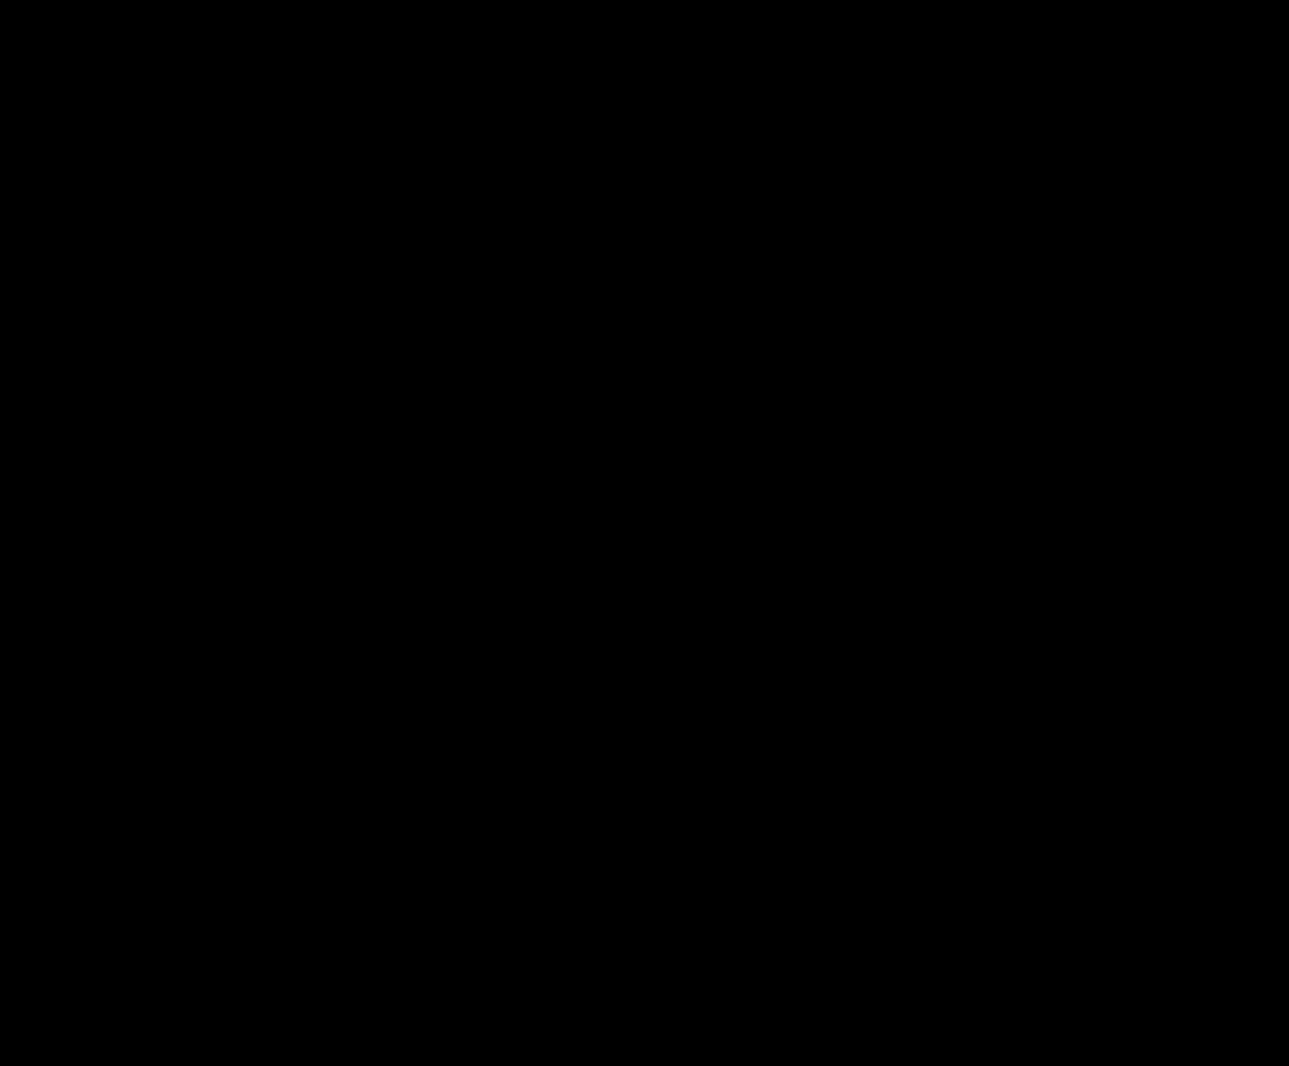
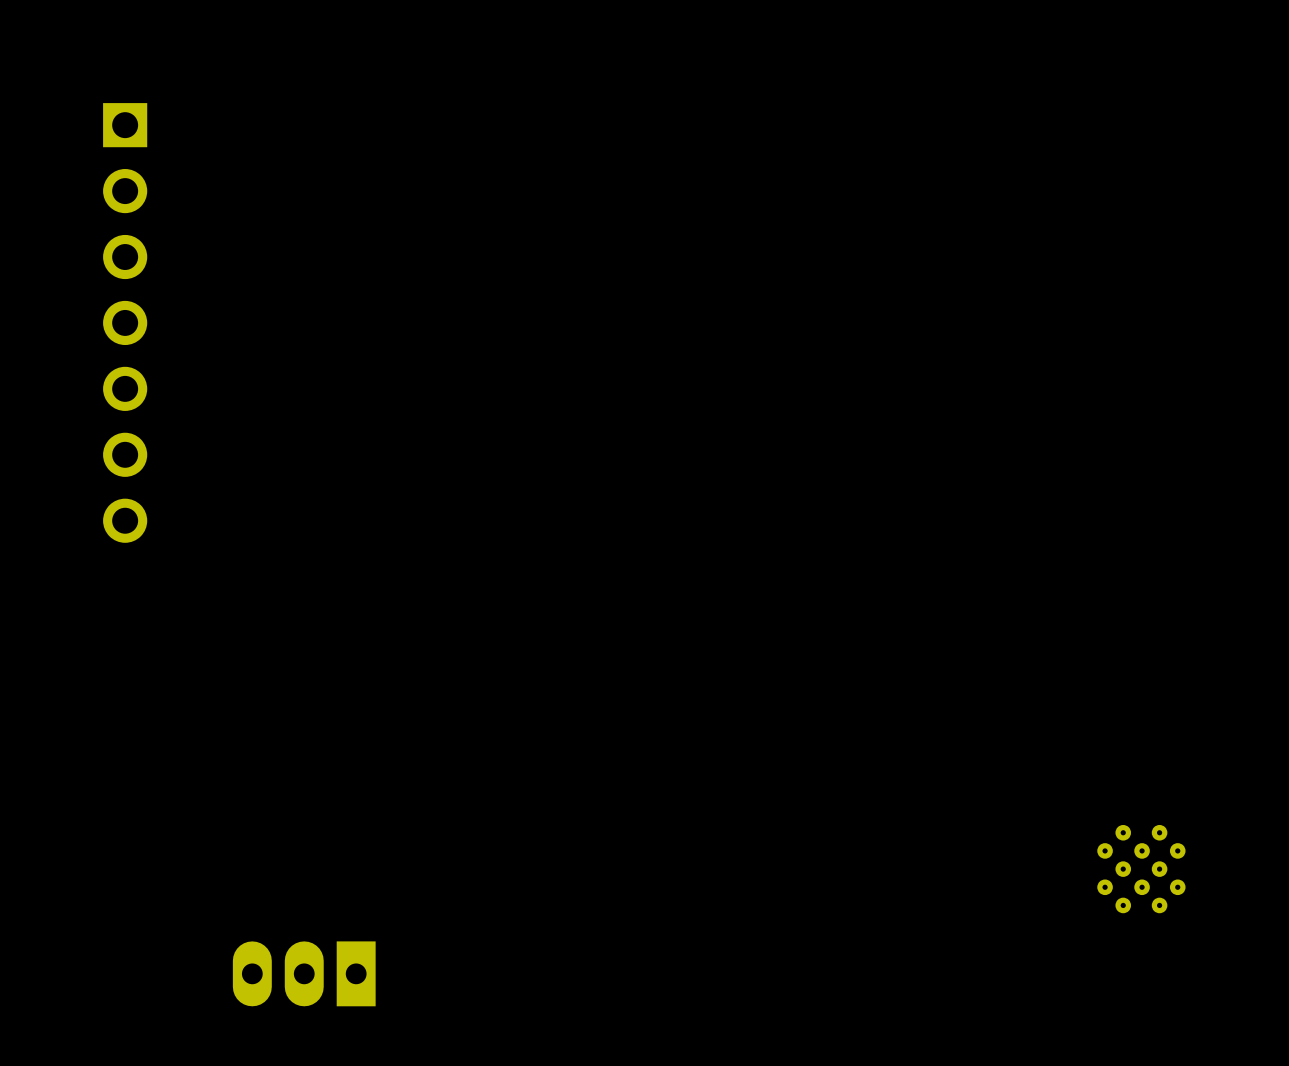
part: none -> (125, 322)
part: none -> (1141, 869)
part: none -> (304, 973)

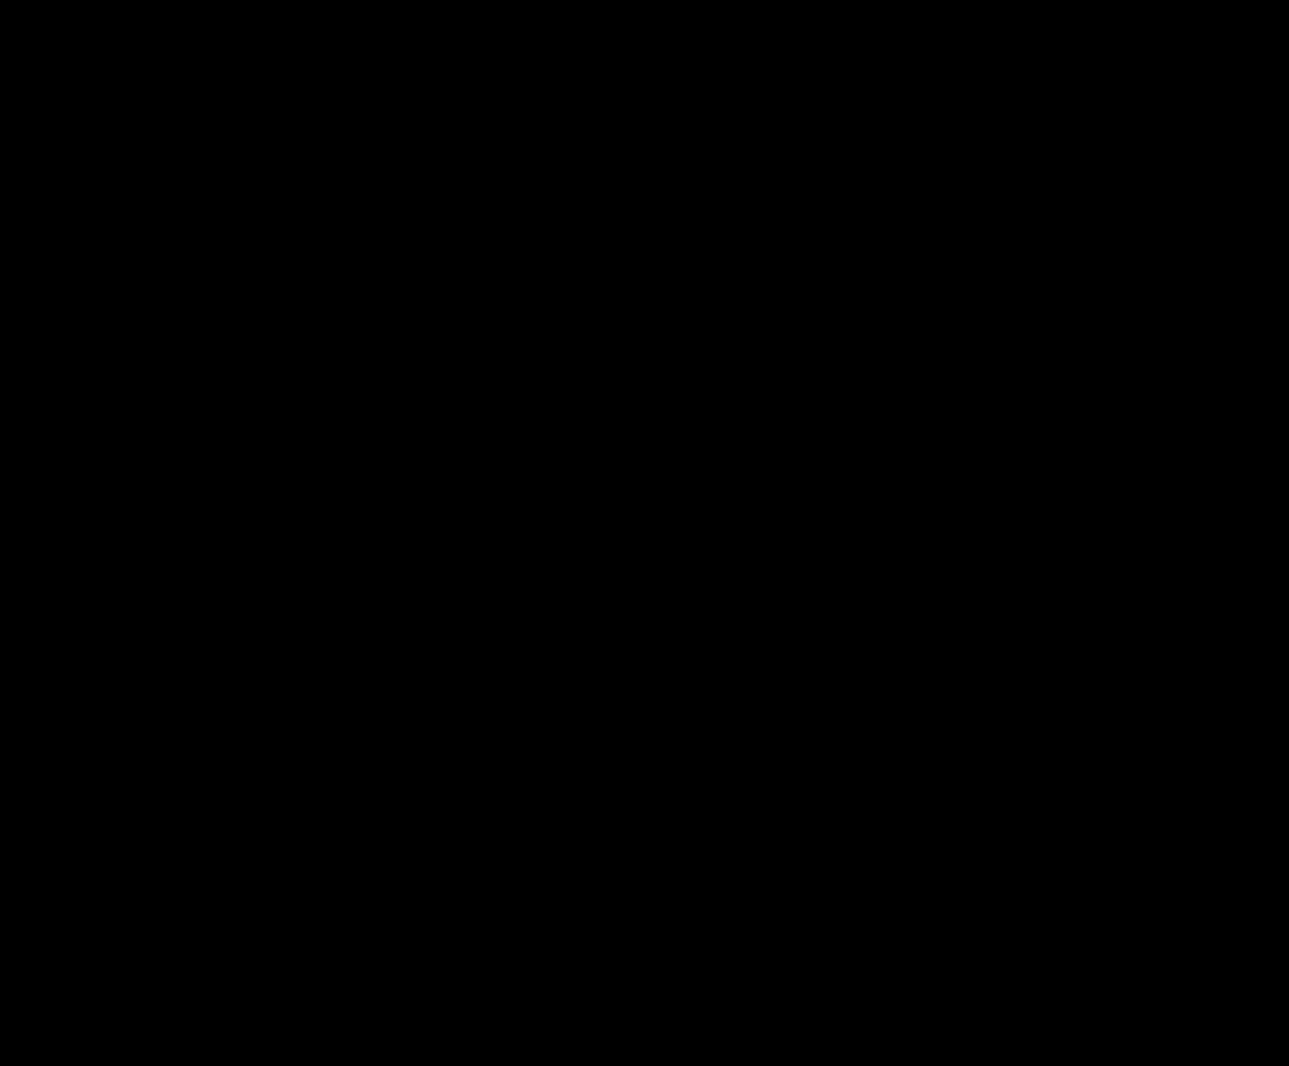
part: (125, 322) -> none
part: (1141, 869) -> none
part: (304, 973) -> none

